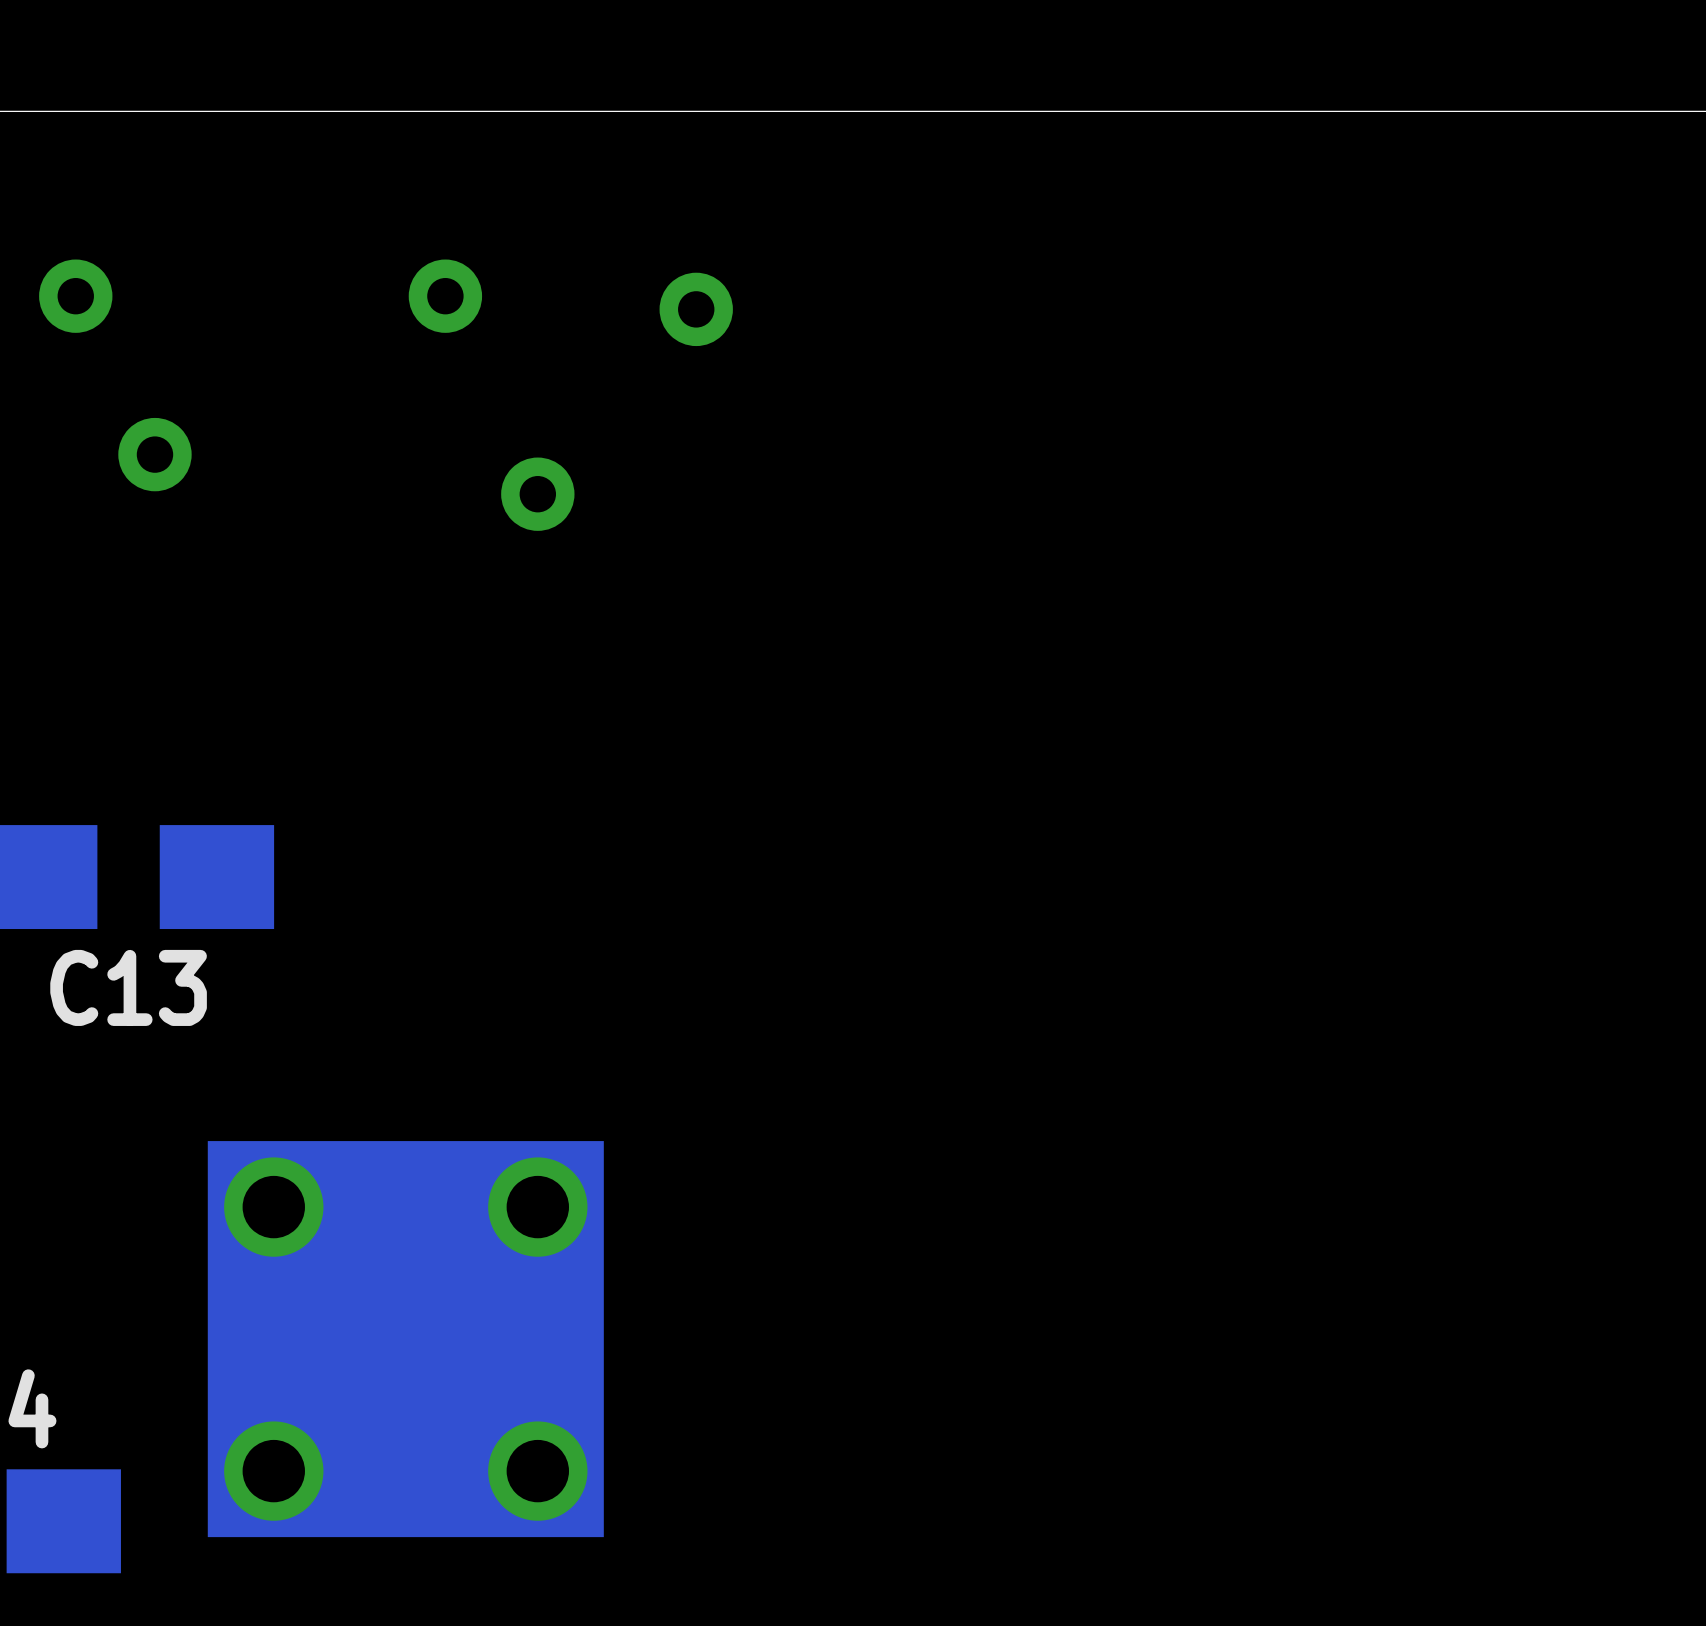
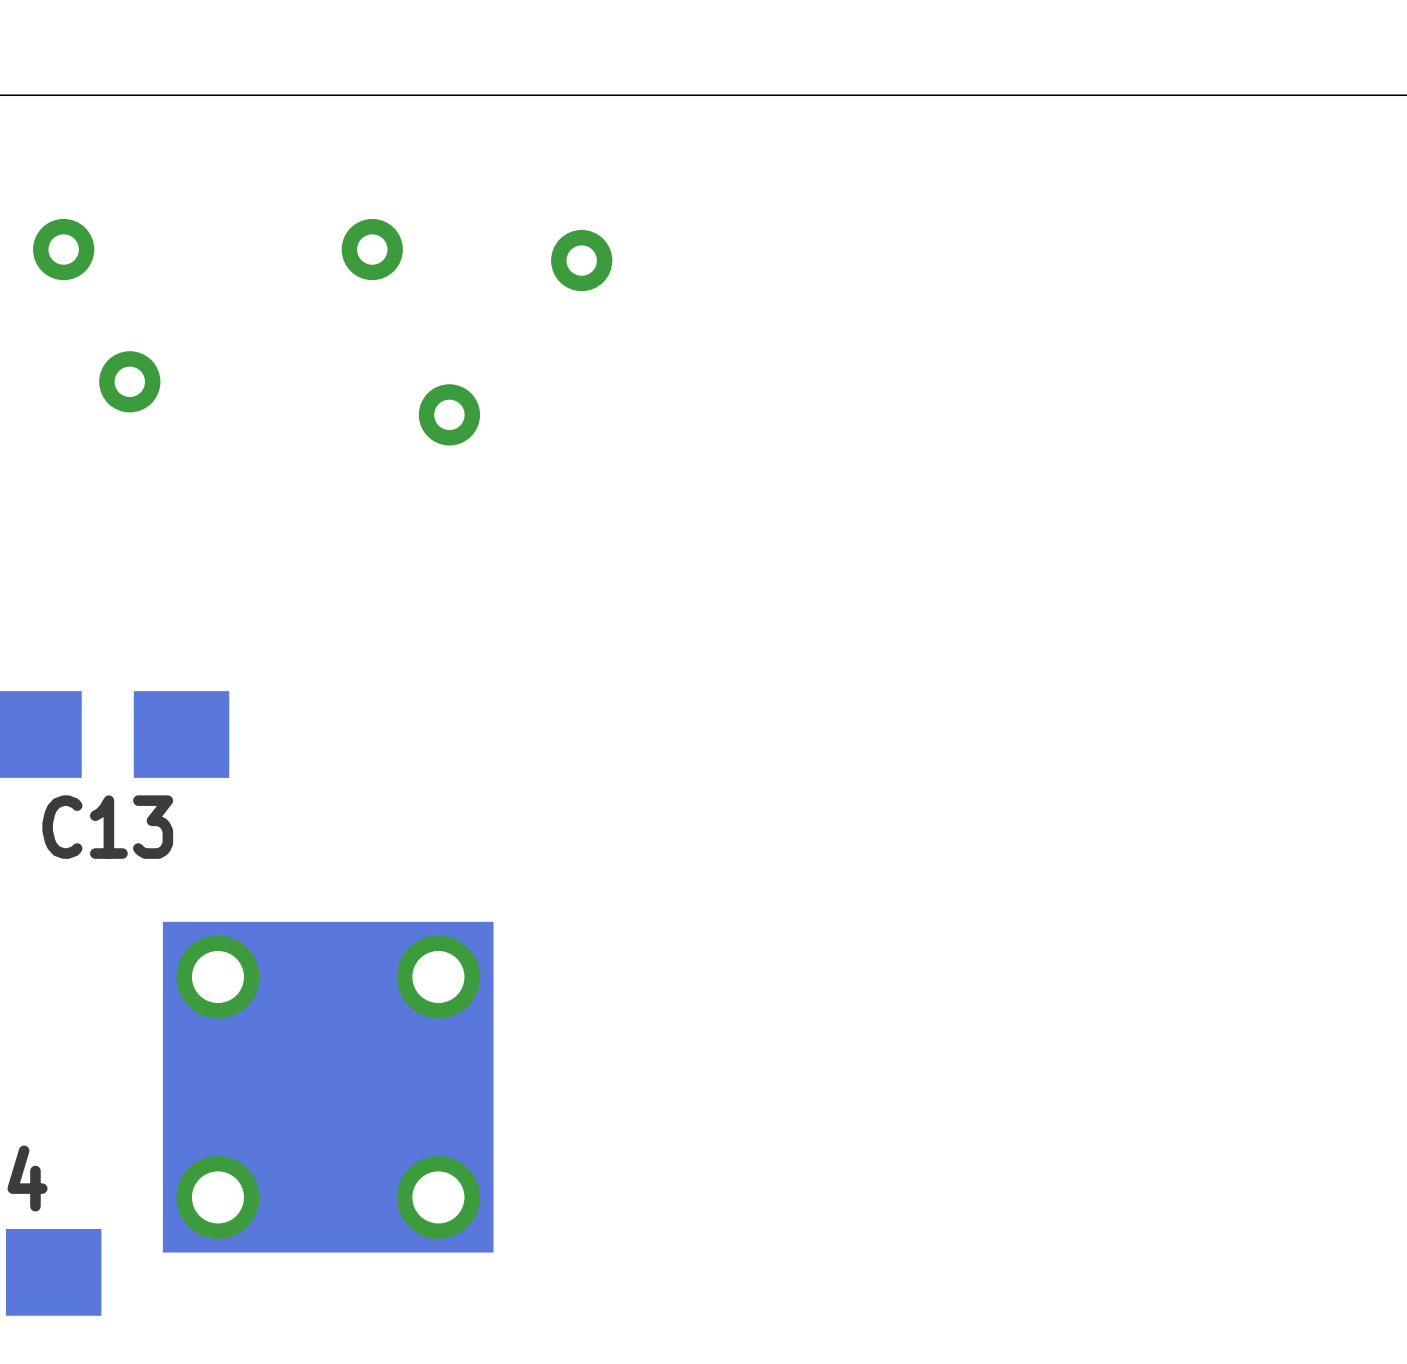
part position: (405, 1339) -> (328, 1087)

